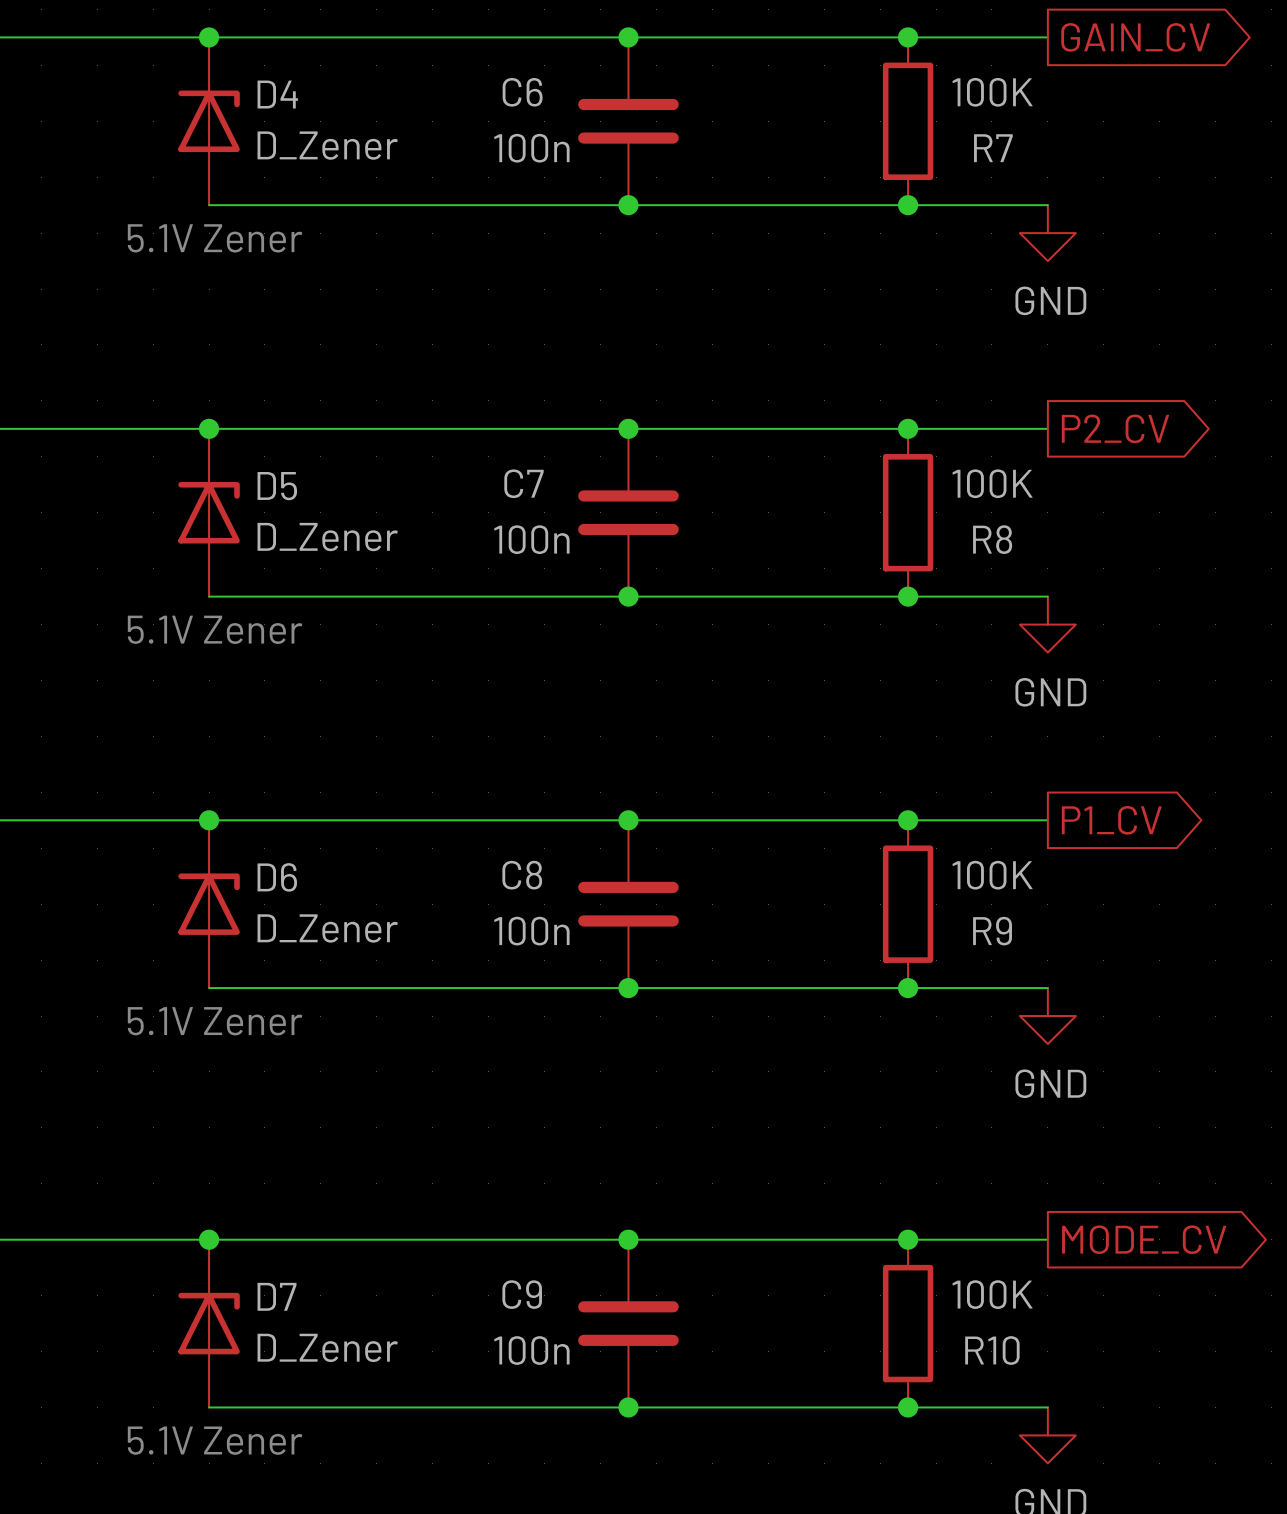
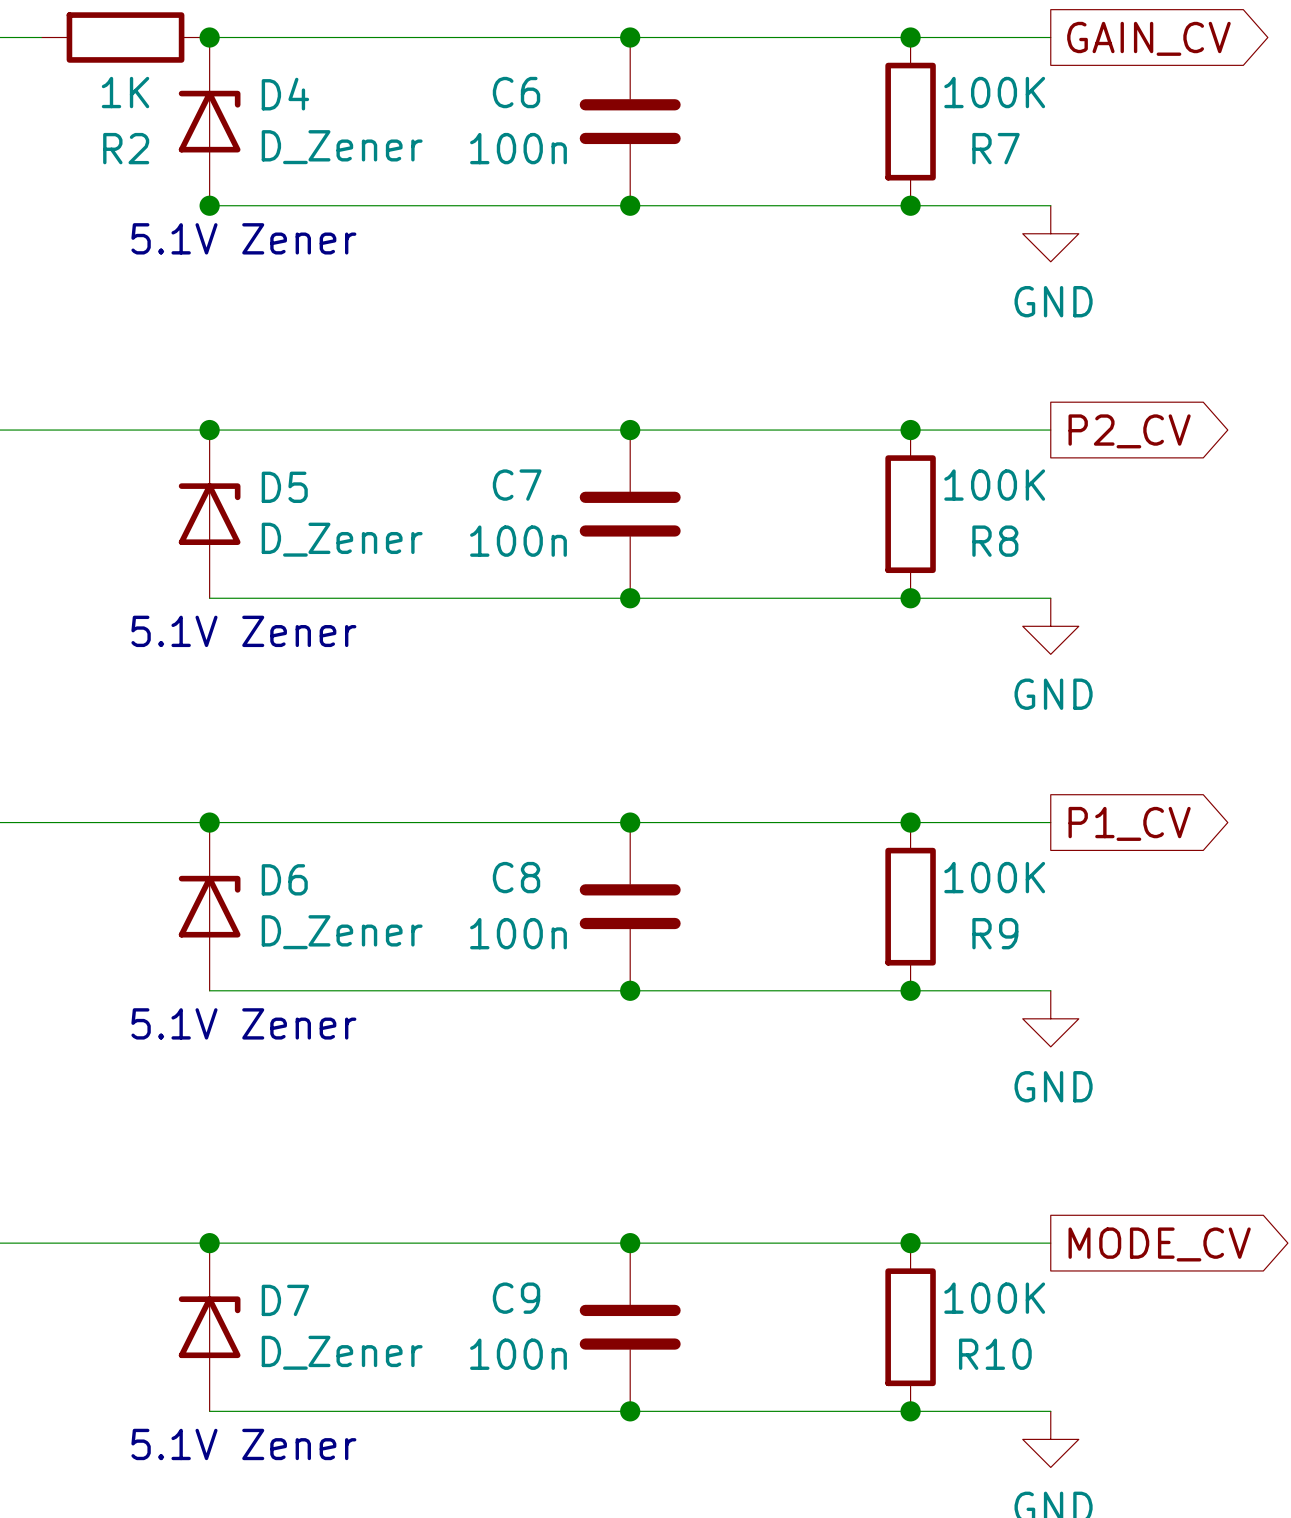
wire: (41, 37) (209, 37) -> none
R2: none -> 1K (125, 37)
junction: none -> (209, 205)

